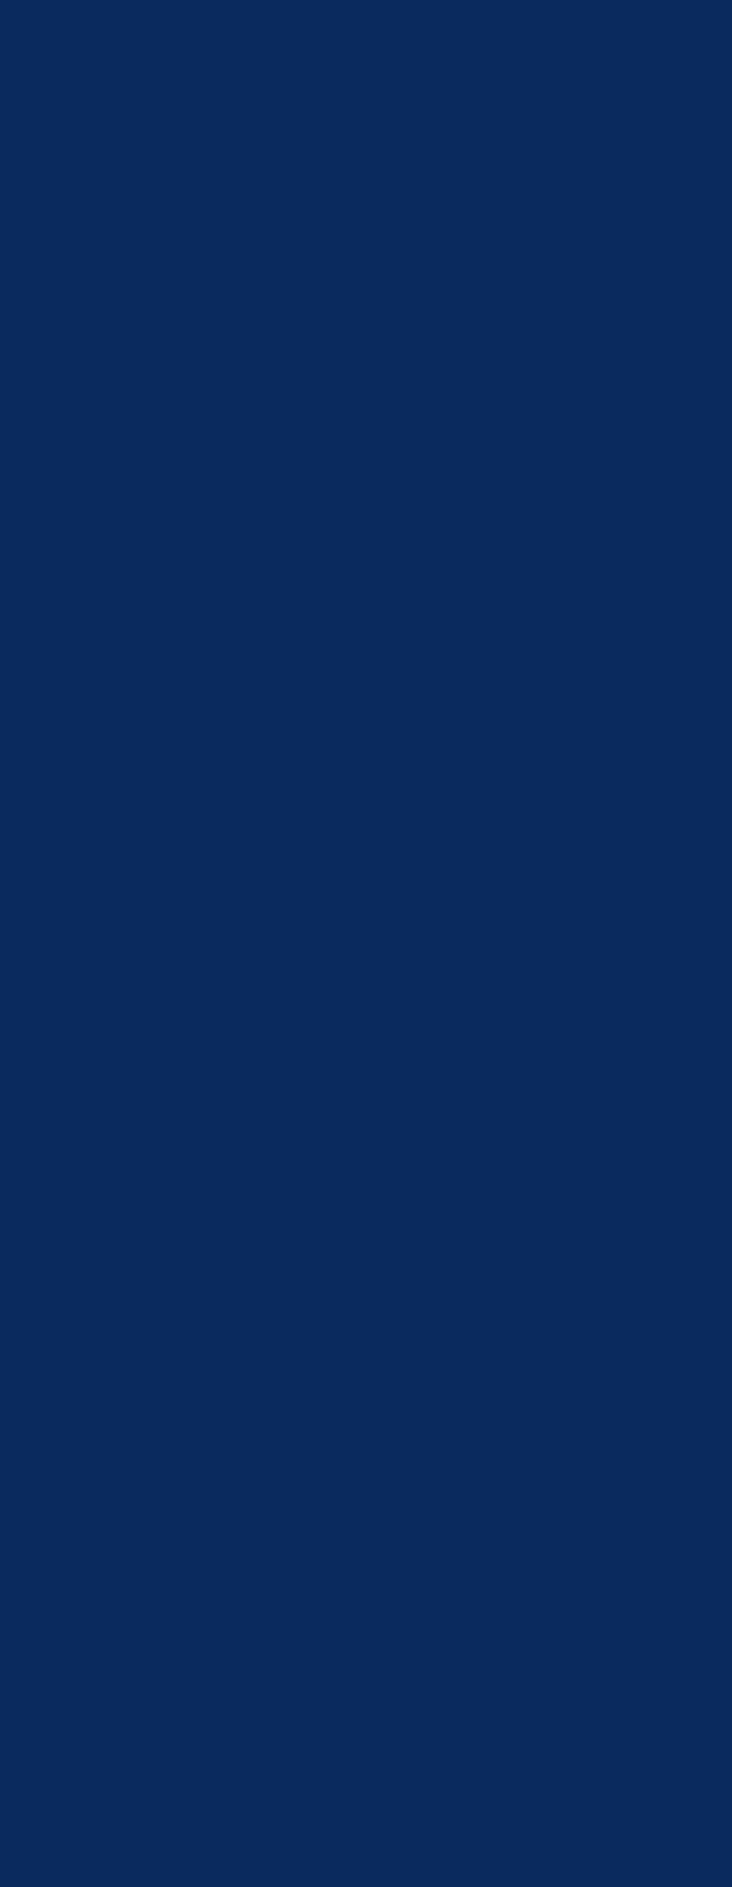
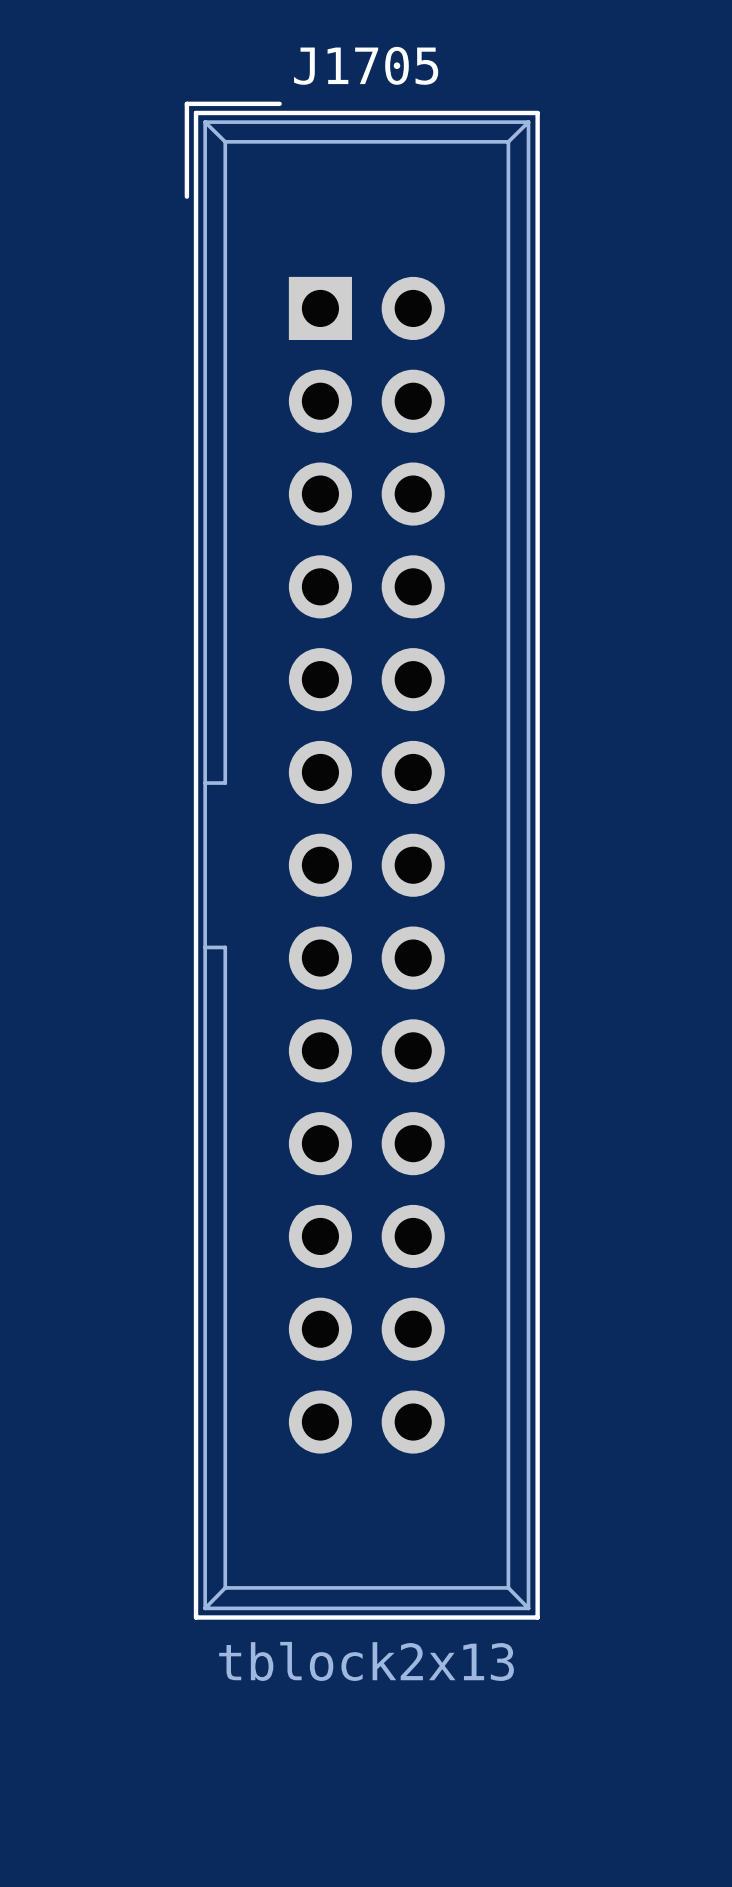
J1705: none -> tblock2x13 (362, 860)

